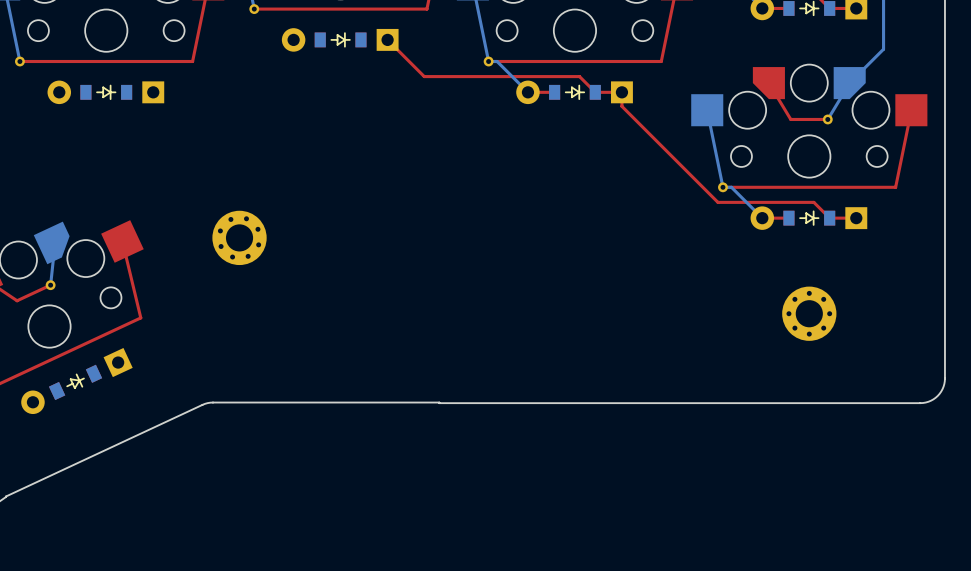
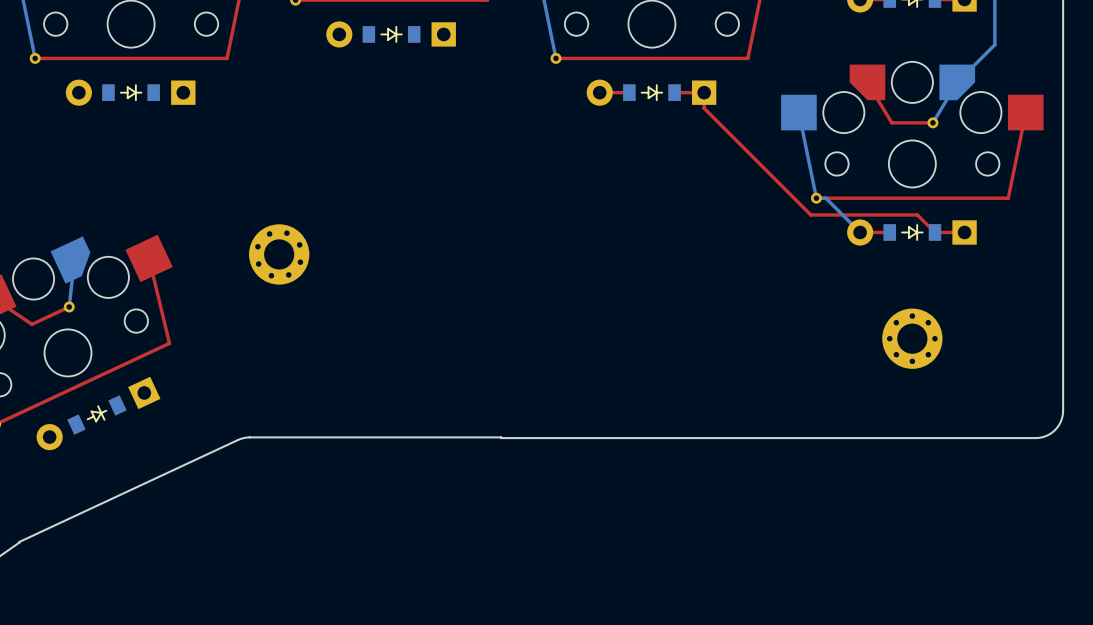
top track: (387, 39) (424, 76) (579, 76) (595, 92) -> none
bottom track: (488, 61) (497, 61) (527, 92) -> none

